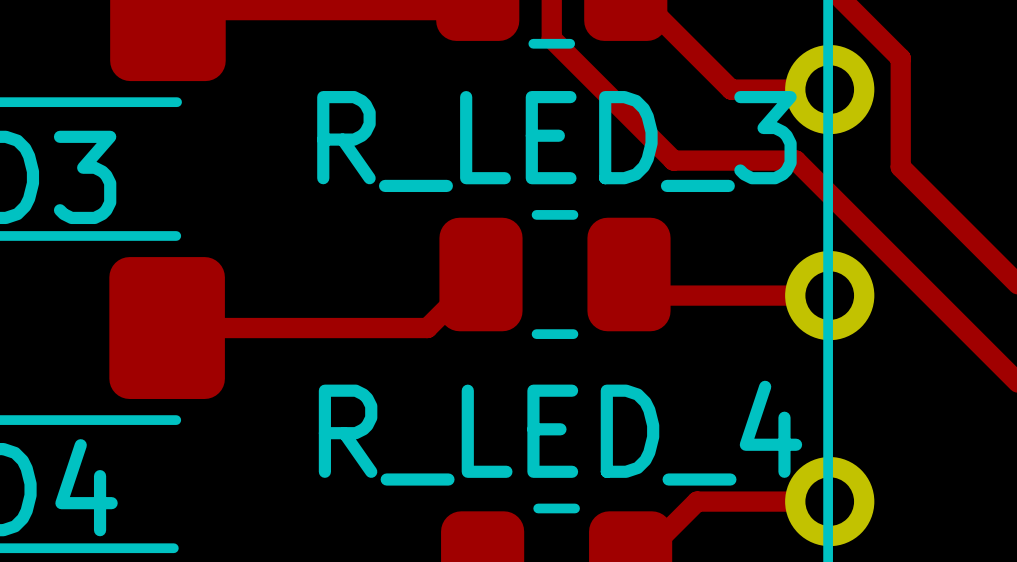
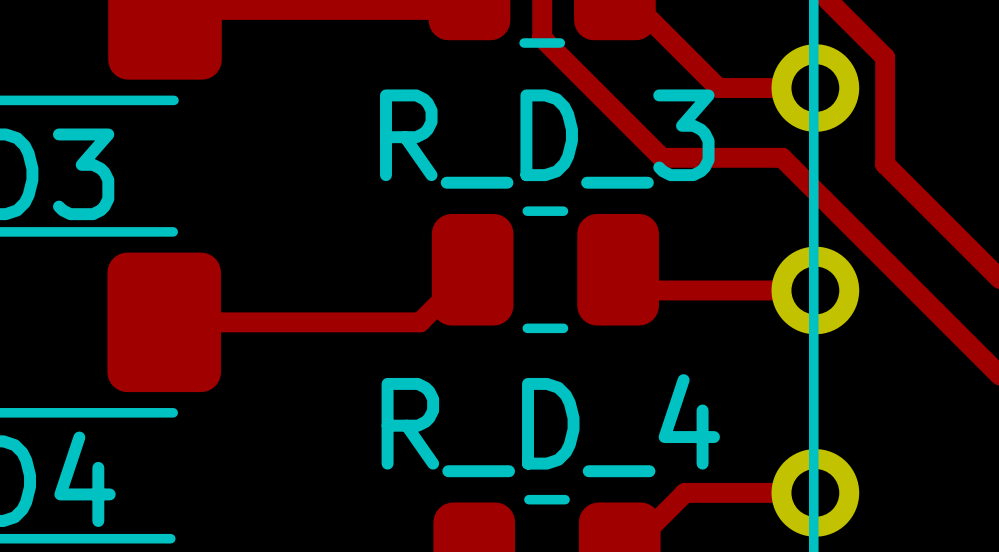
R_LED_3 name: R_LED_3 (556, 141) -> R_D_3 (547, 139)
R_LED_4 name: R_LED_4 (560, 433) -> R_D_4 (550, 425)

